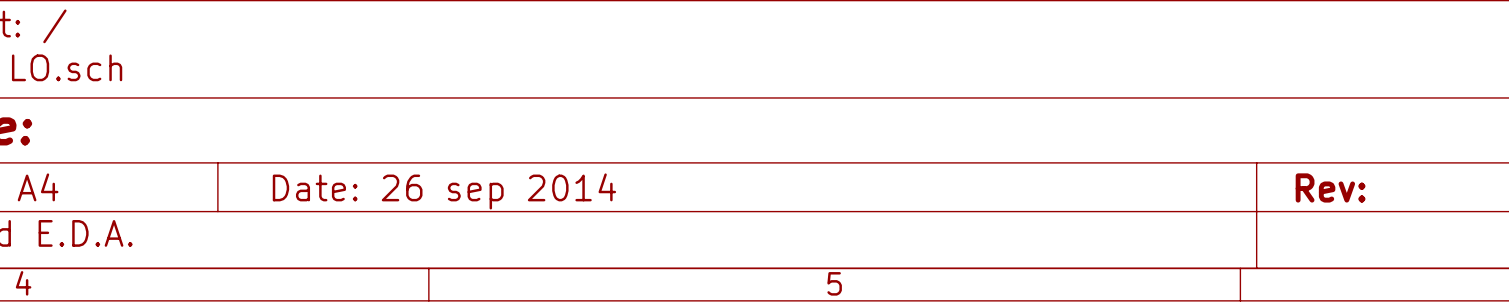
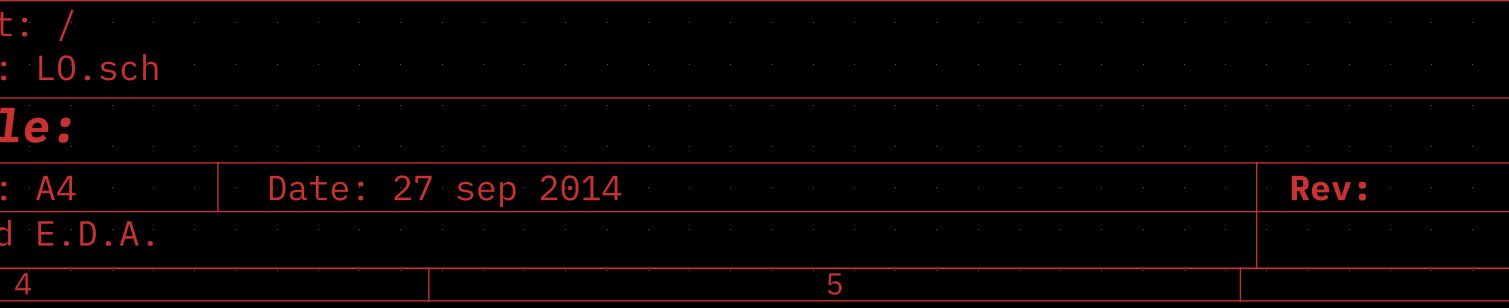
title block: Date: 26 sep 2014 (444, 191) -> Date: 27 sep 2014 (445, 191)

